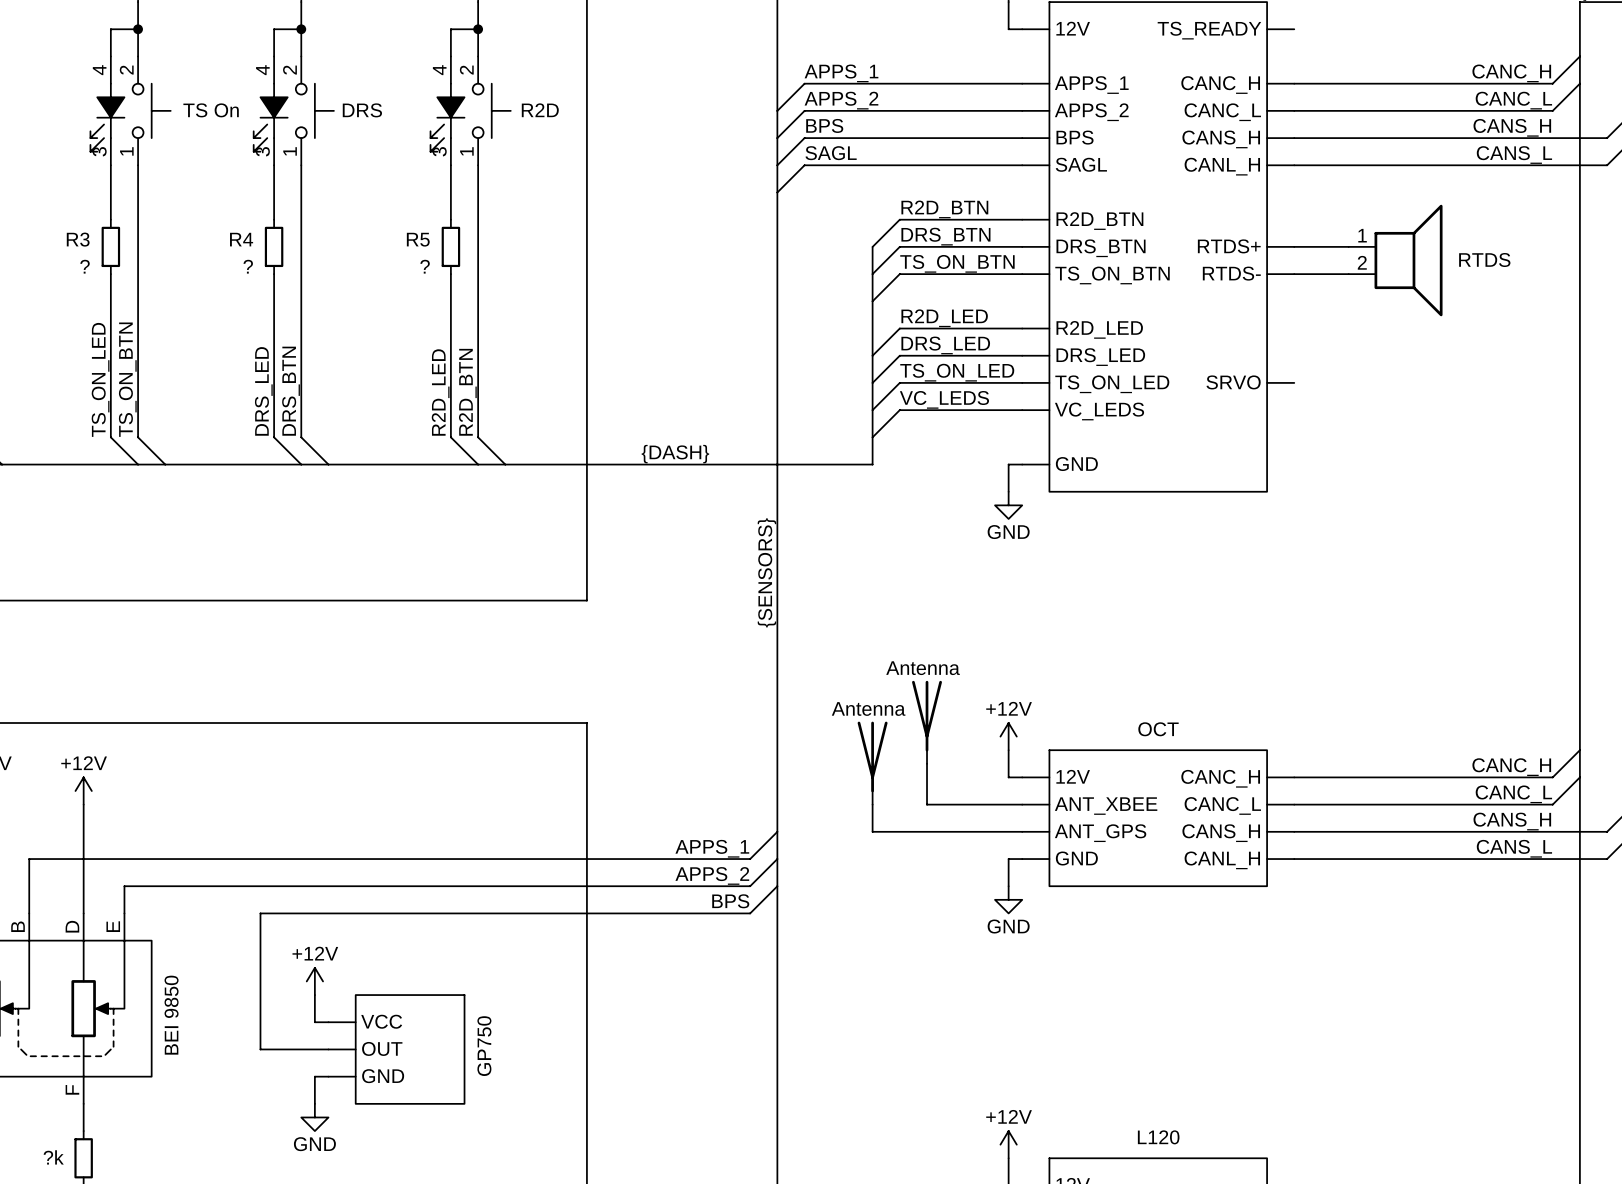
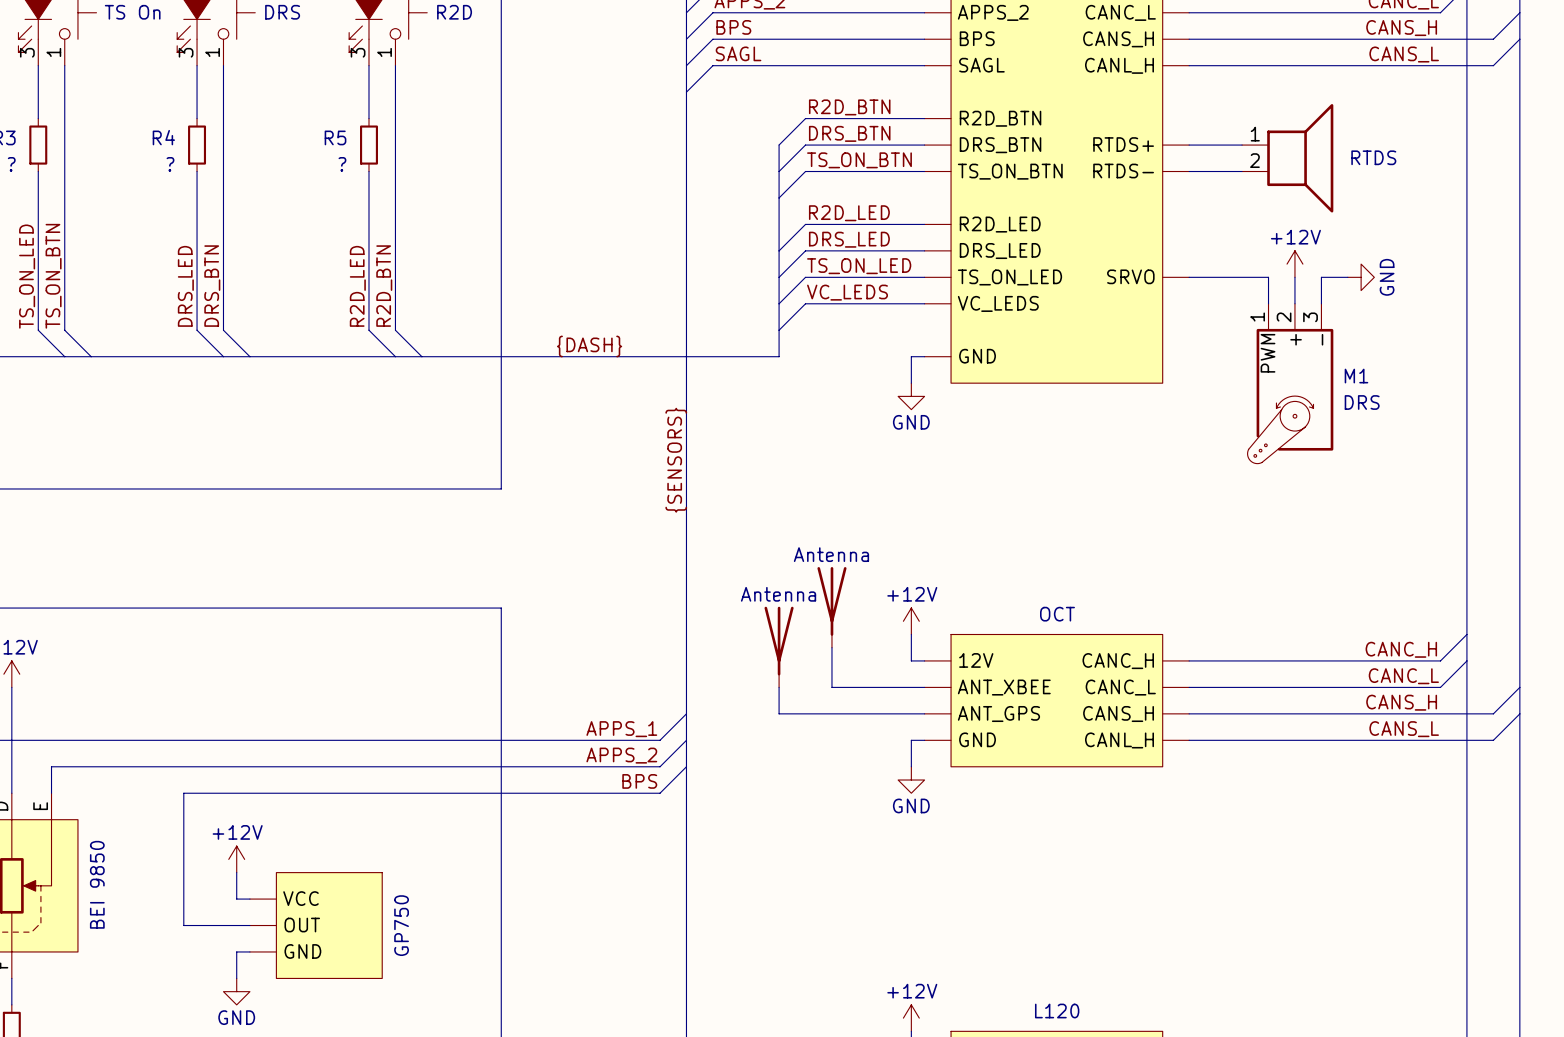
power symbol: none -> +12V (1294, 264)
wire: none -> (1189, 277) (1268, 277) (1268, 303)
wire: none -> (1294, 277) (1294, 303)
wire: none -> (1347, 277) (1321, 277) (1321, 303)
power symbol: none -> GND (1361, 277)
M1: none -> DRS (1290, 383)

